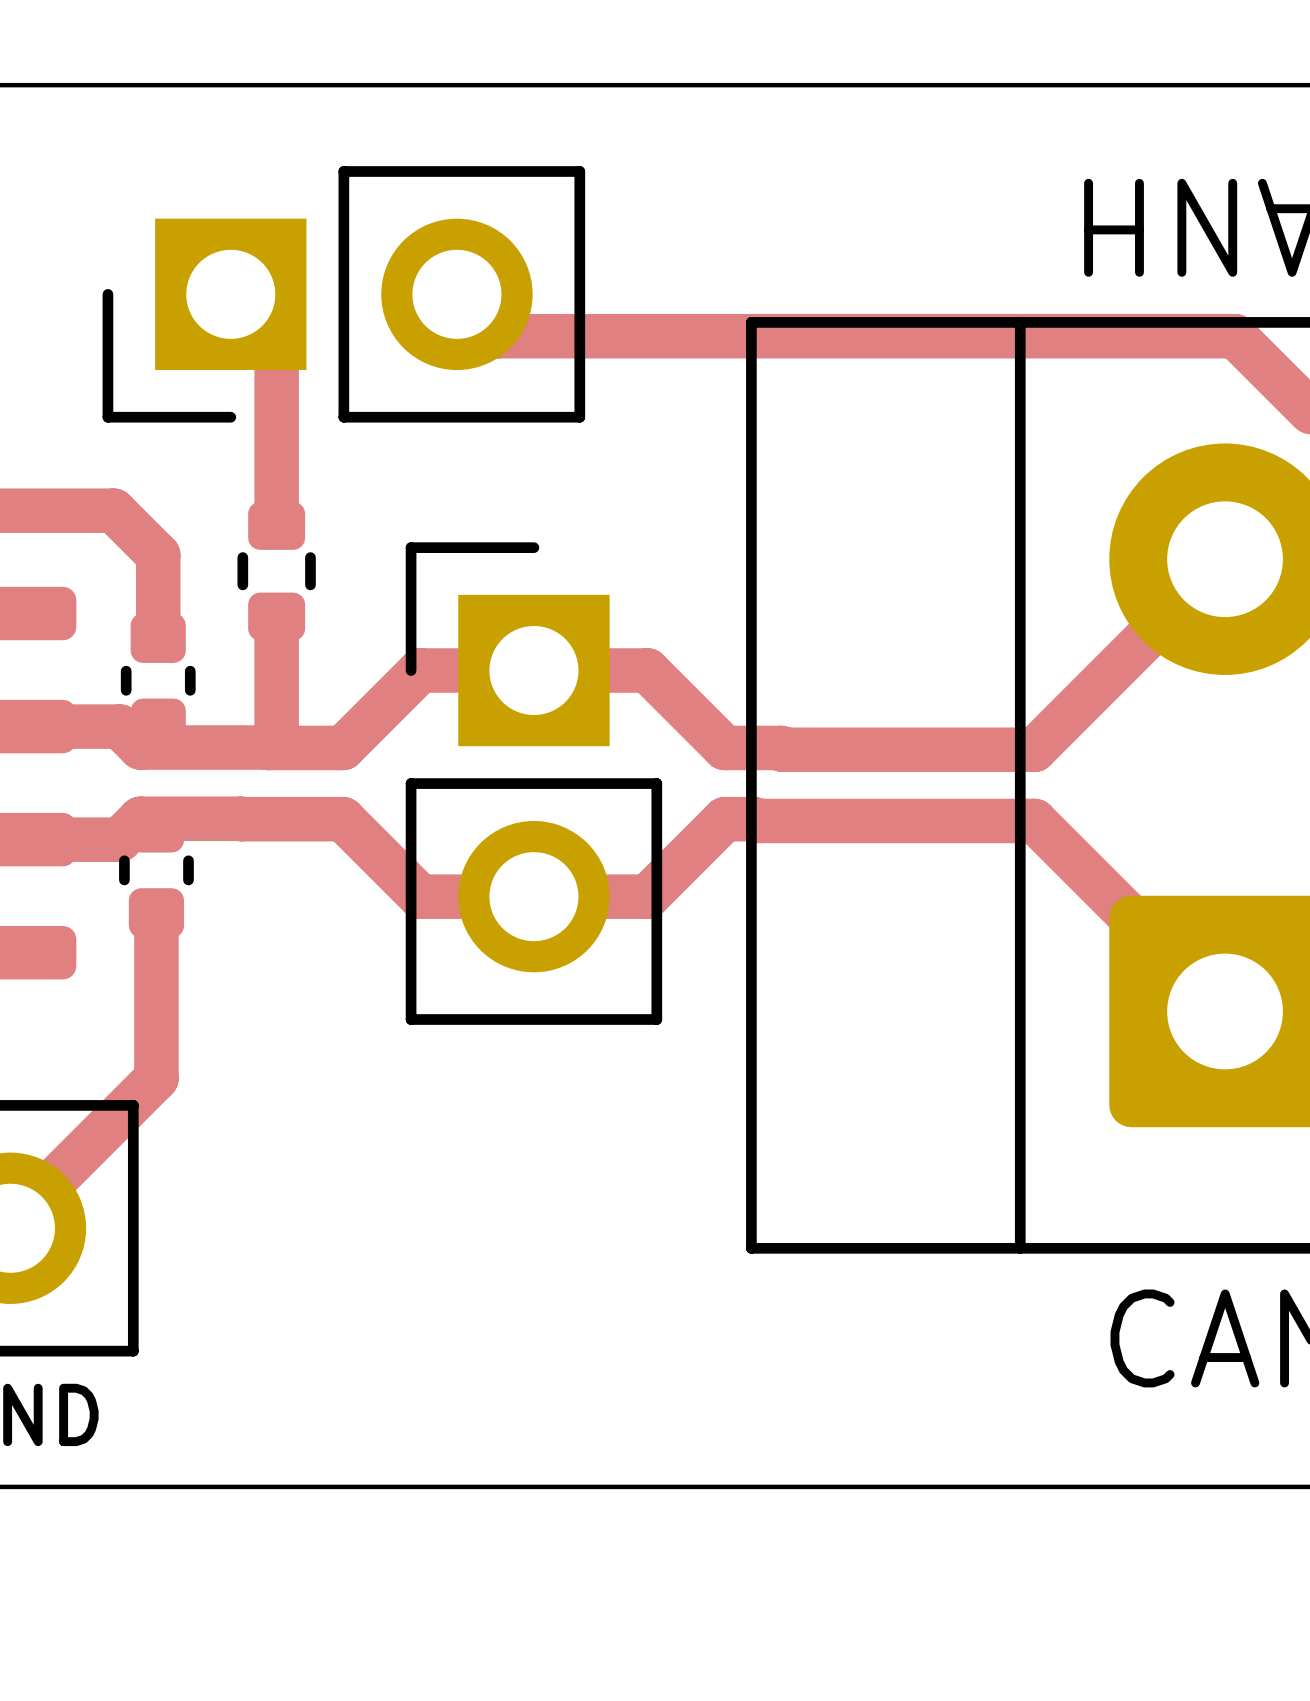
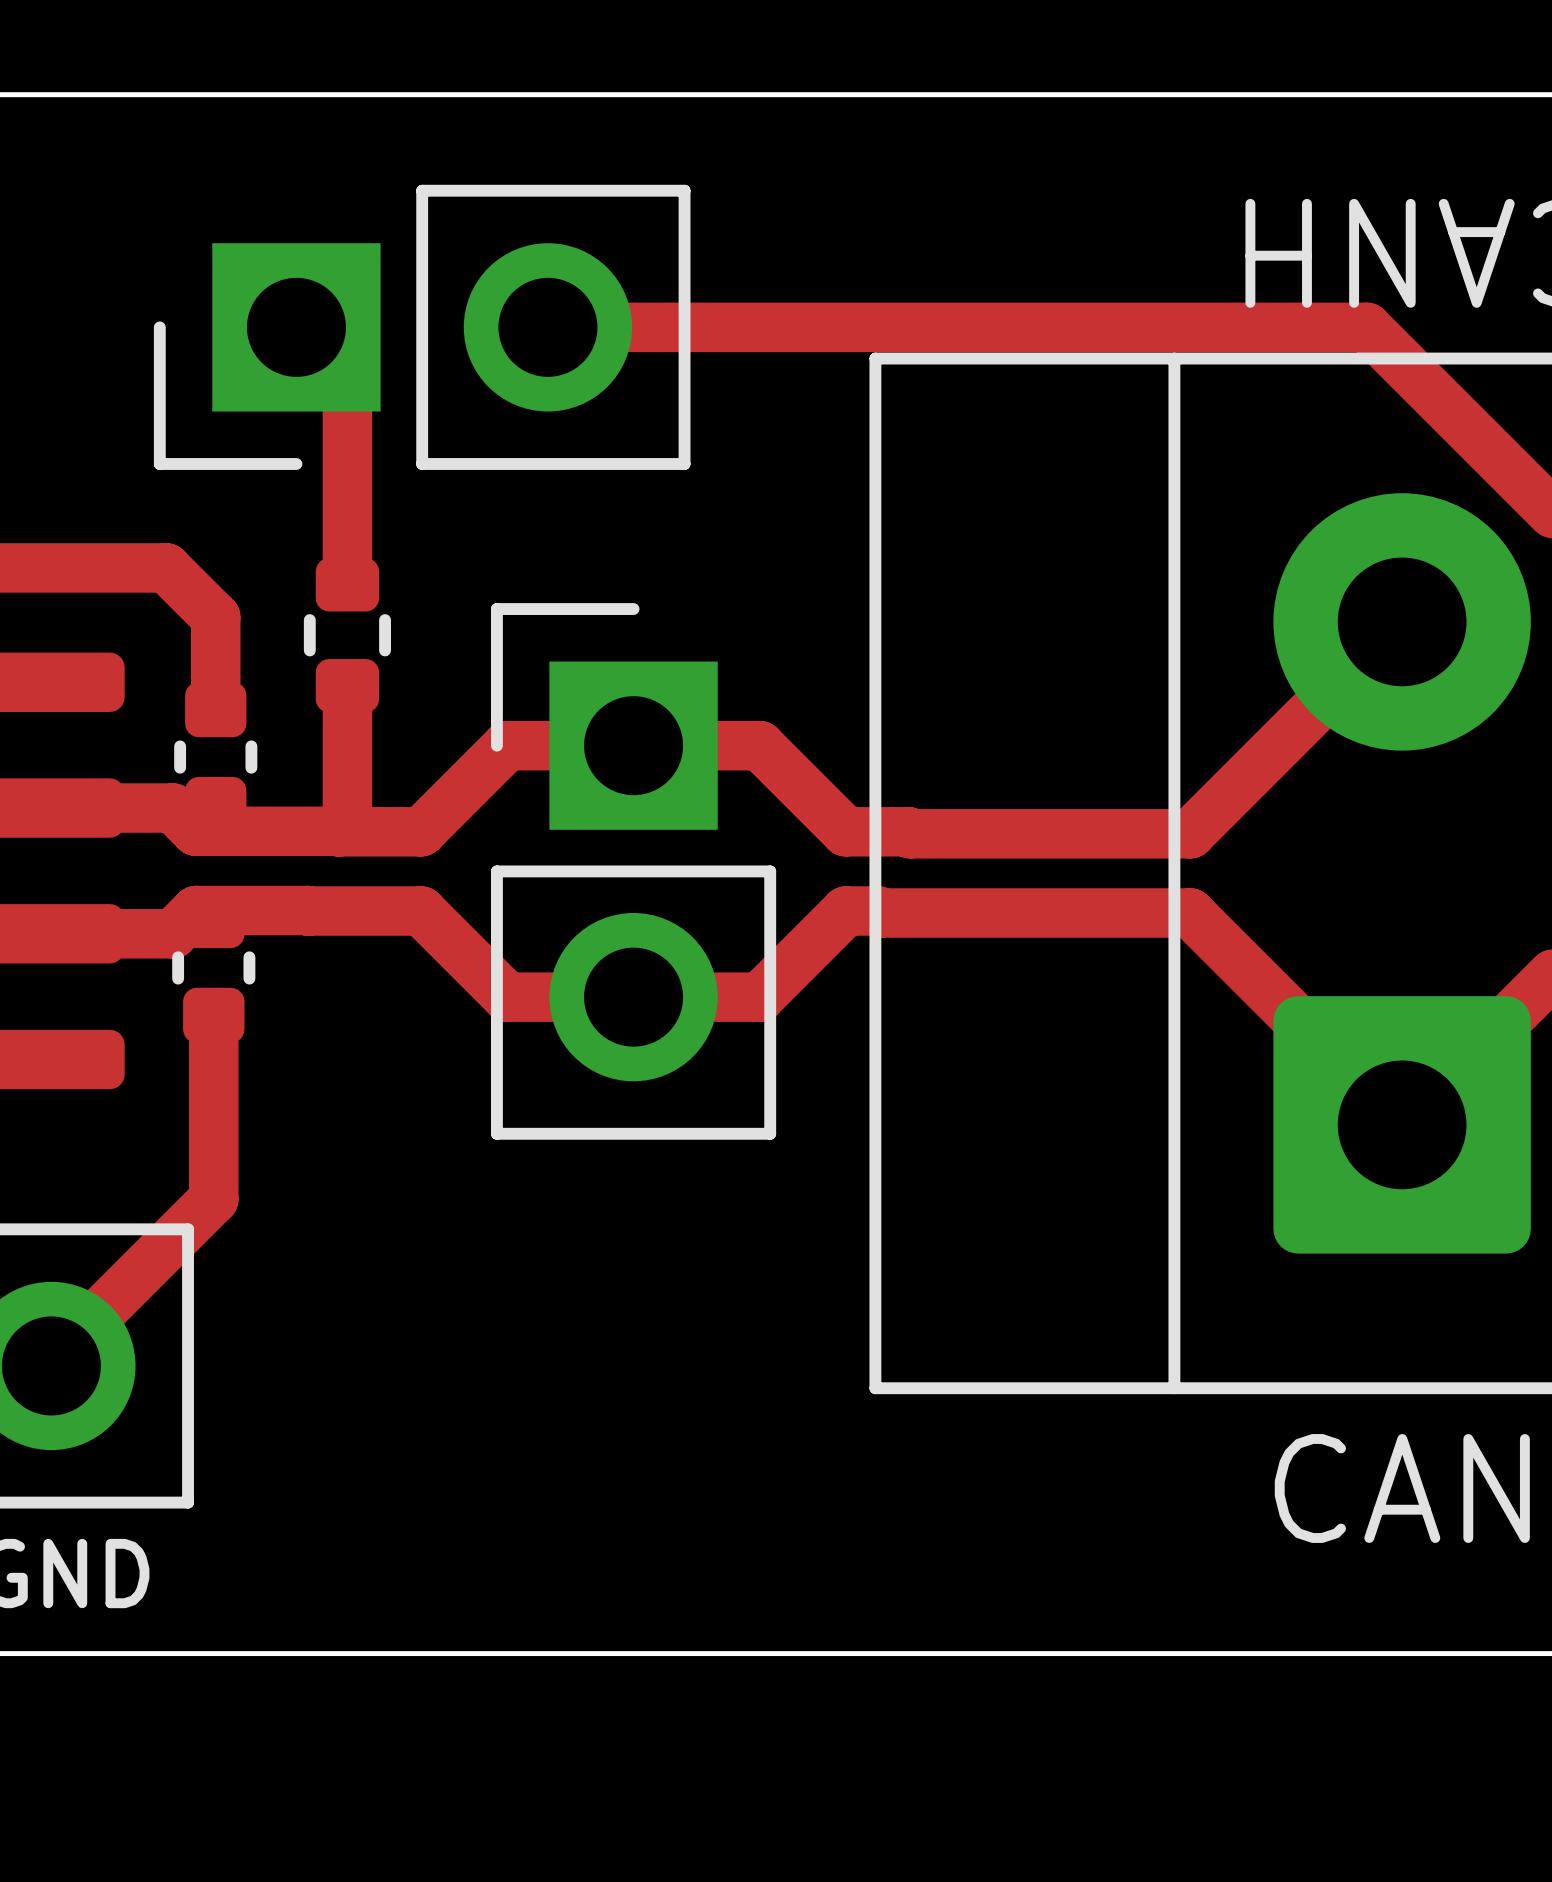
track: (456, 294) (498, 336) (1235, 336) -> (547, 327) (1366, 327) (1413, 373)

